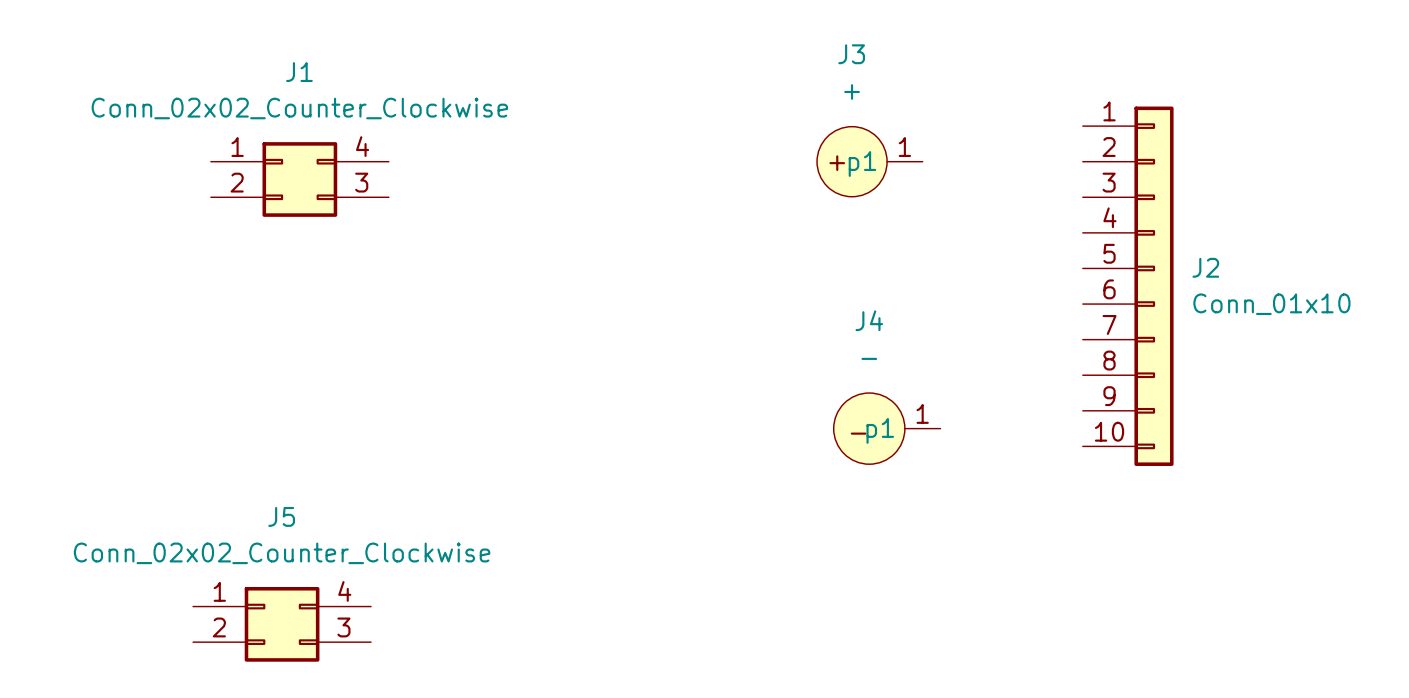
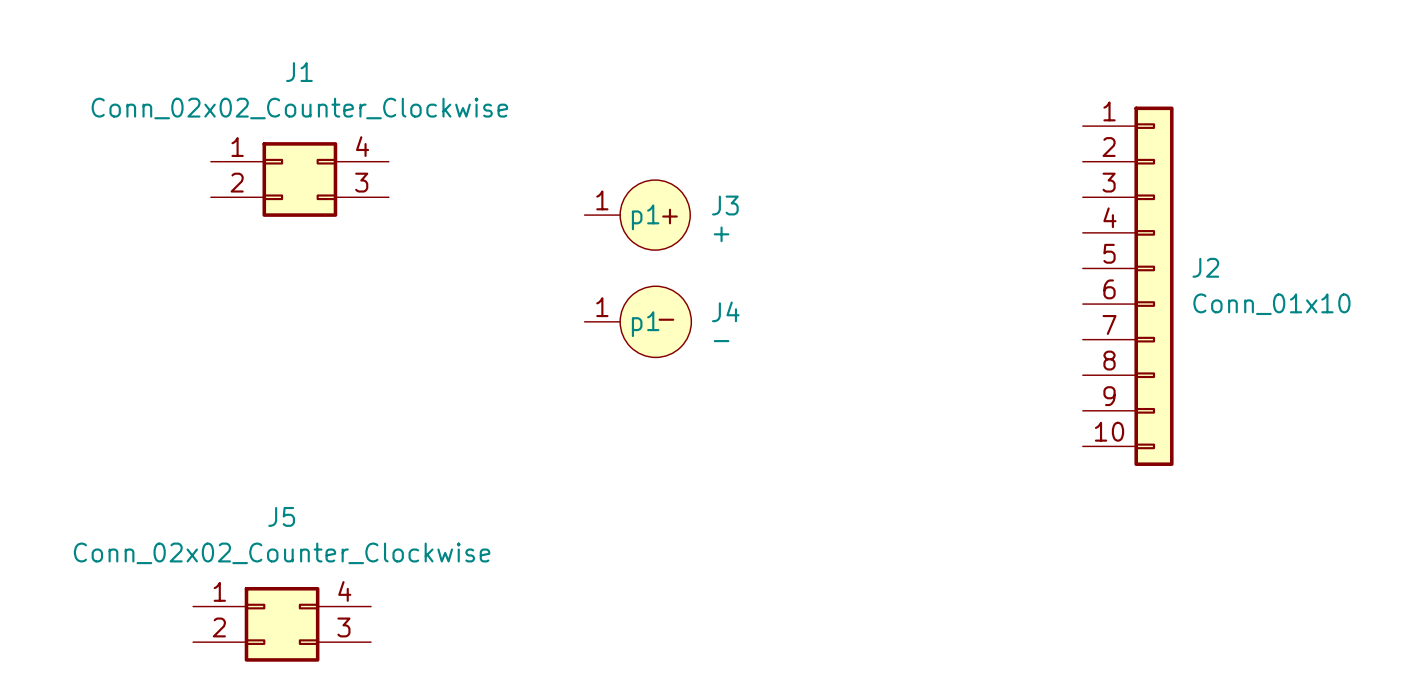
J3 name position: J3 (851, 54) -> J3 (725, 205)
J3 value position: + (852, 91) -> + (721, 234)
J3 rotation: 0° (852, 161) -> 180° (655, 215)
J3 position: (869, 161) -> (637, 215)
J4 name position: J4 (869, 320) -> J4 (725, 311)
J4 value position: - (869, 358) -> - (721, 341)
J4 rotation: 0° (869, 428) -> 180° (655, 321)
J4 position: (887, 428) -> (637, 321)

